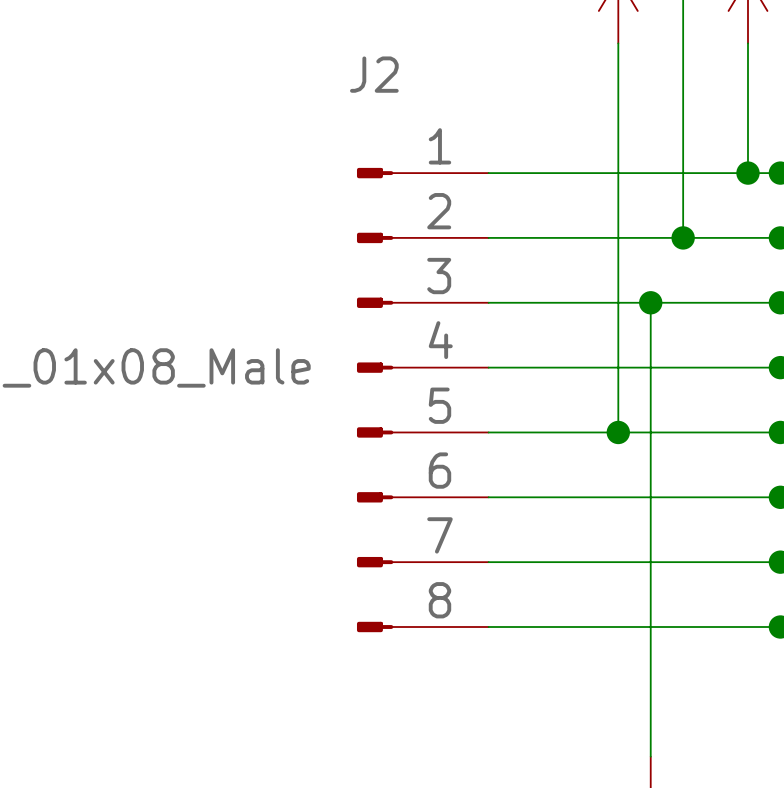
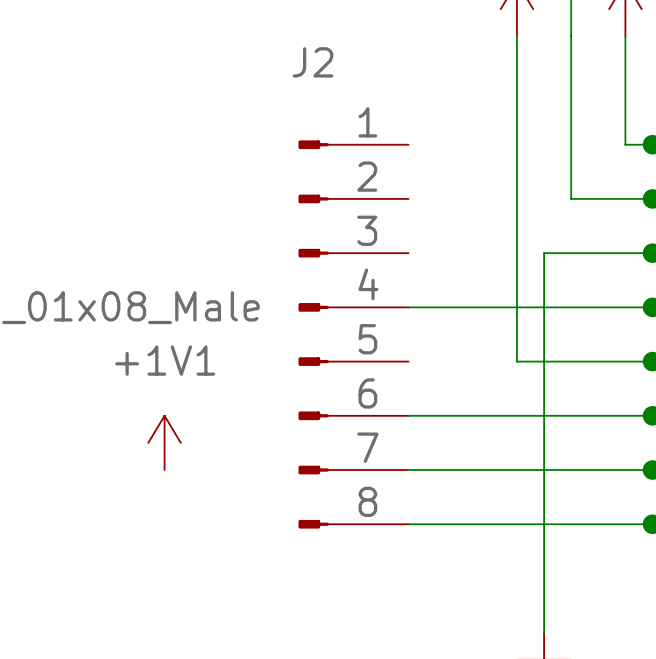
wire: (488, 173) (747, 173) -> none
junction: (747, 173) -> none
wire: (488, 237) (683, 237) -> none
junction: (683, 237) -> none
wire: (488, 302) (650, 302) -> none
junction: (650, 302) -> none
wire: (488, 432) (618, 432) -> none
junction: (618, 432) -> none
power symbol: none -> +1V1 (164, 442)

